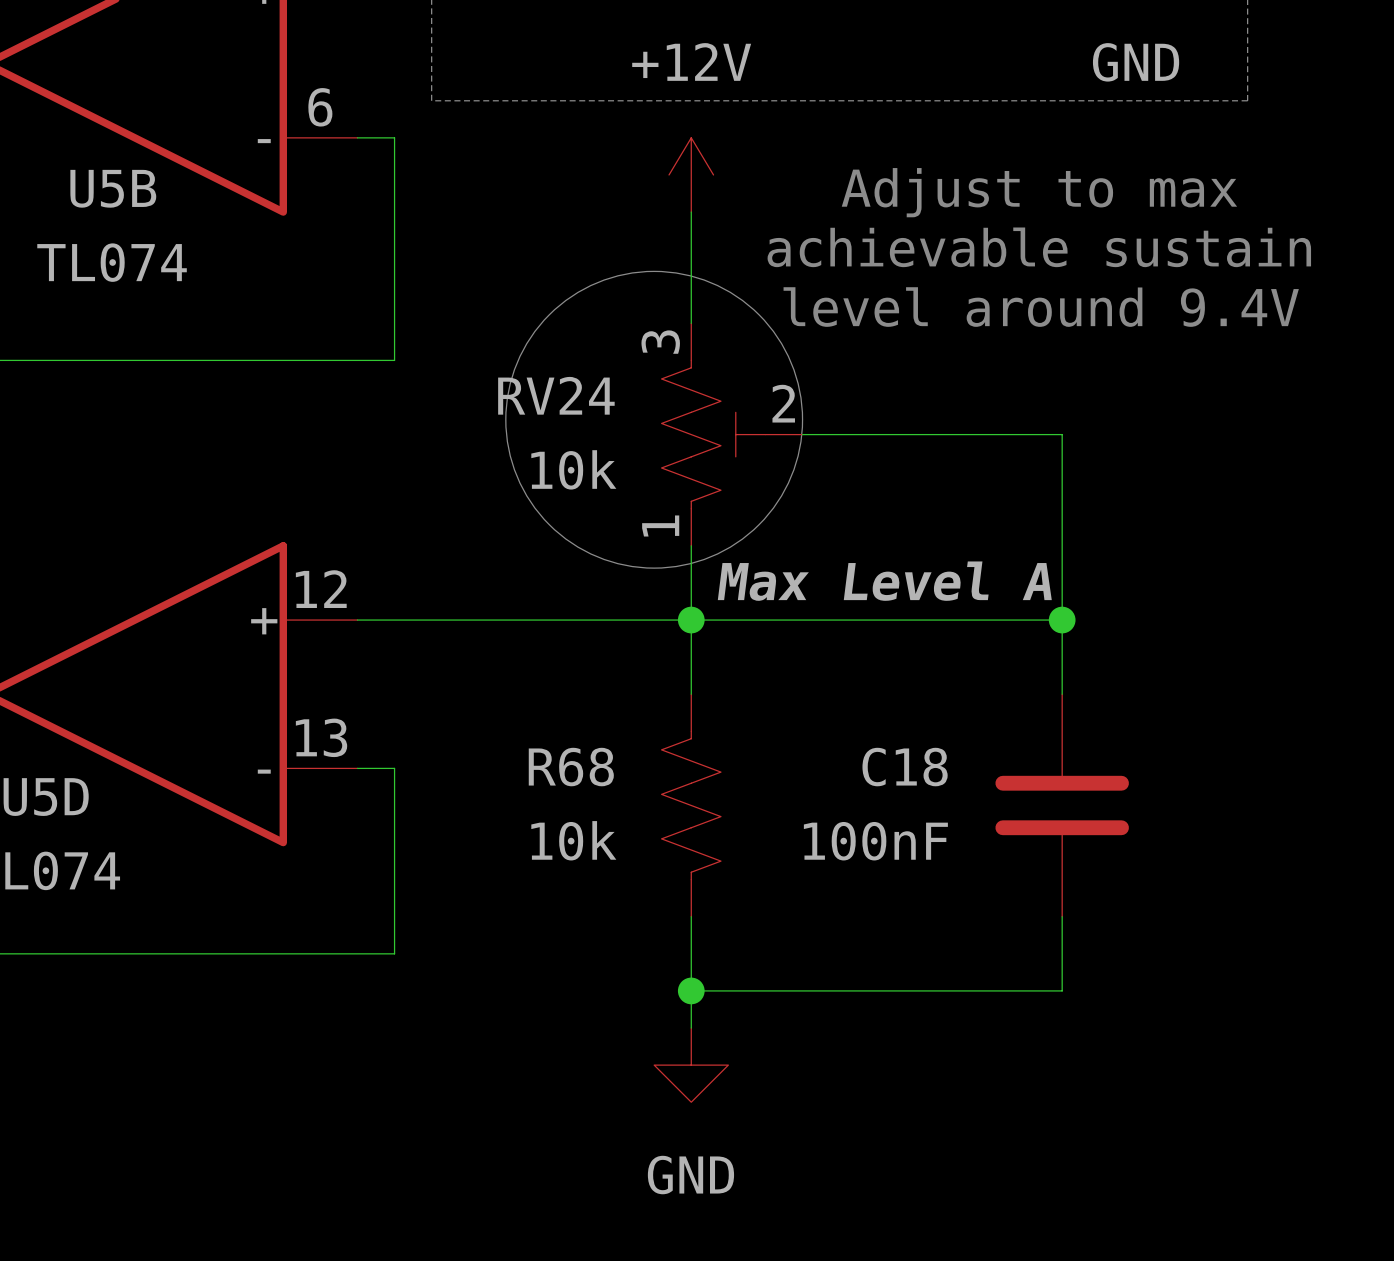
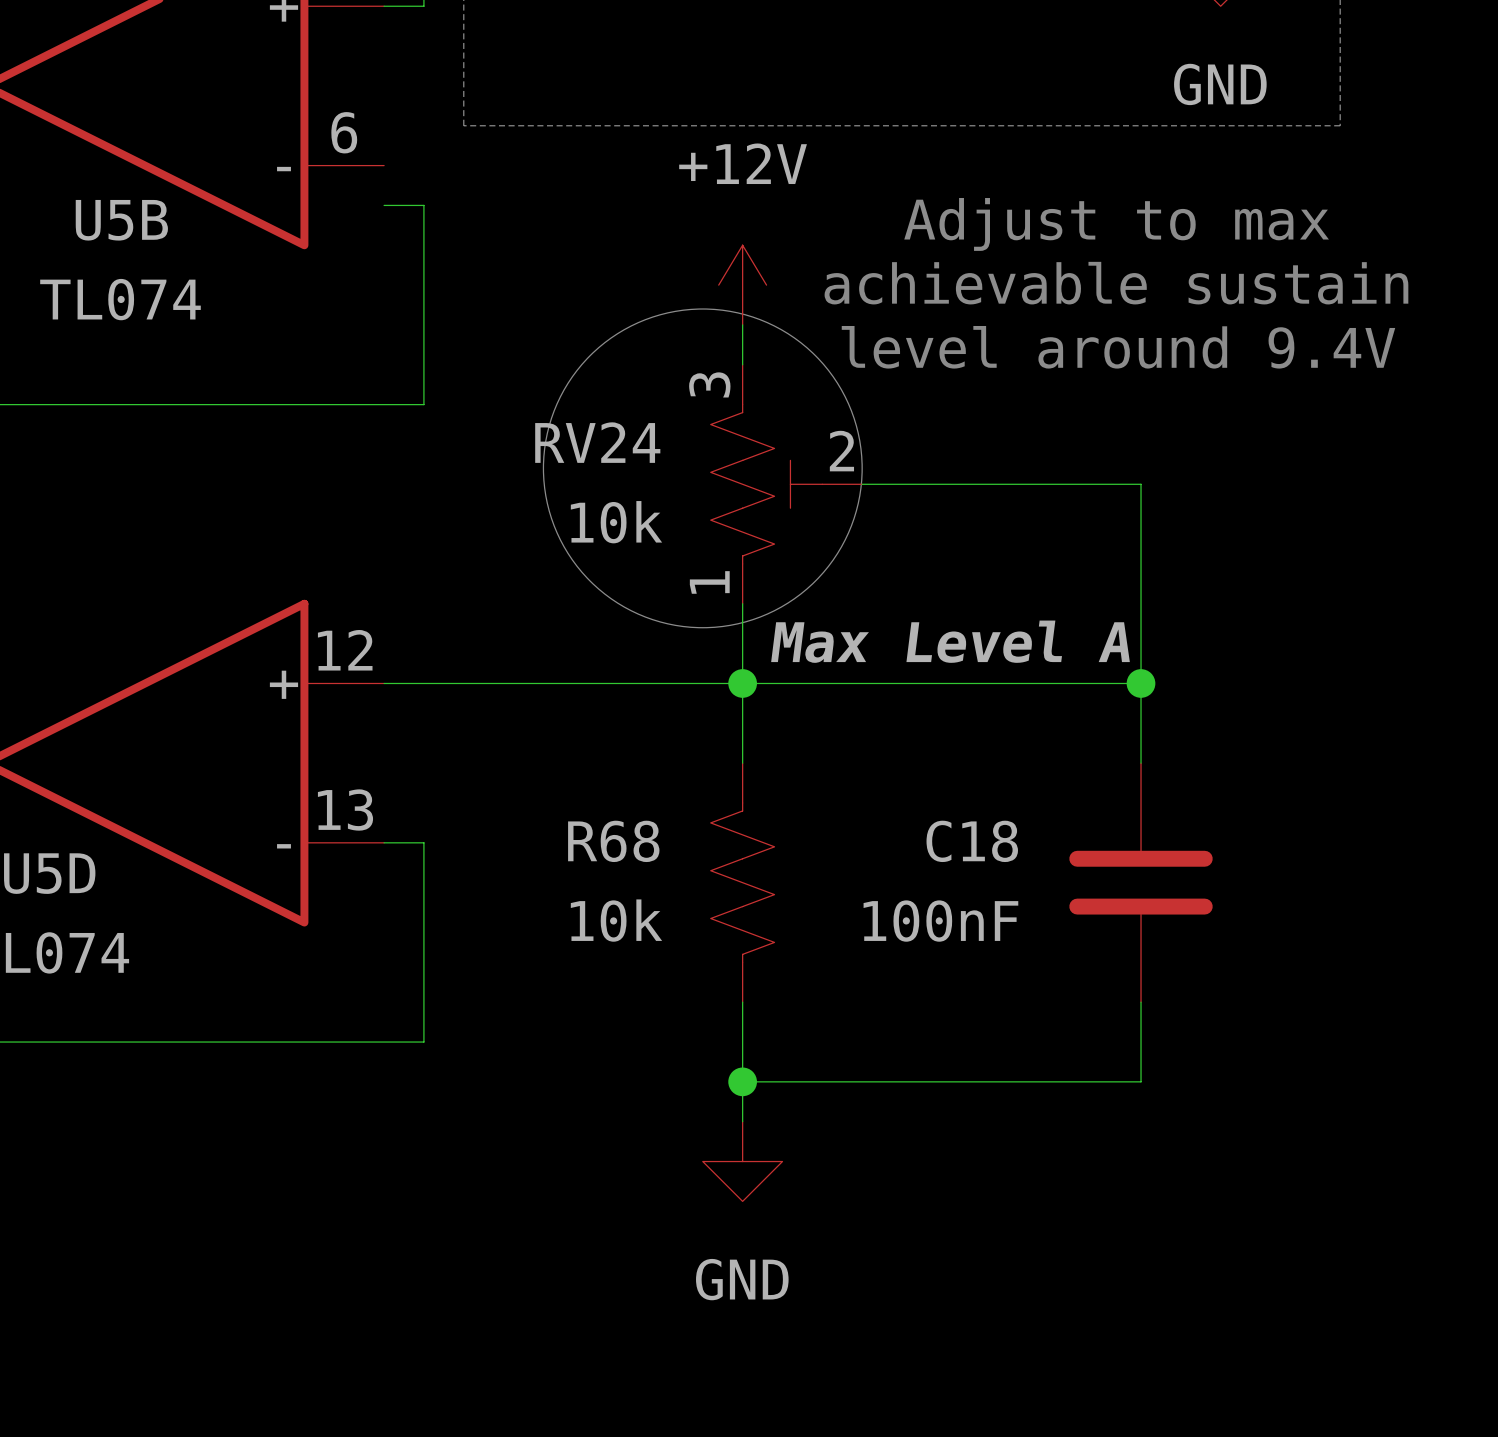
wire: (357, 137) (394, 137) (394, 174) -> (384, 205) (423, 205)
power symbol position: +12V (691, 174) -> +12V (742, 285)

